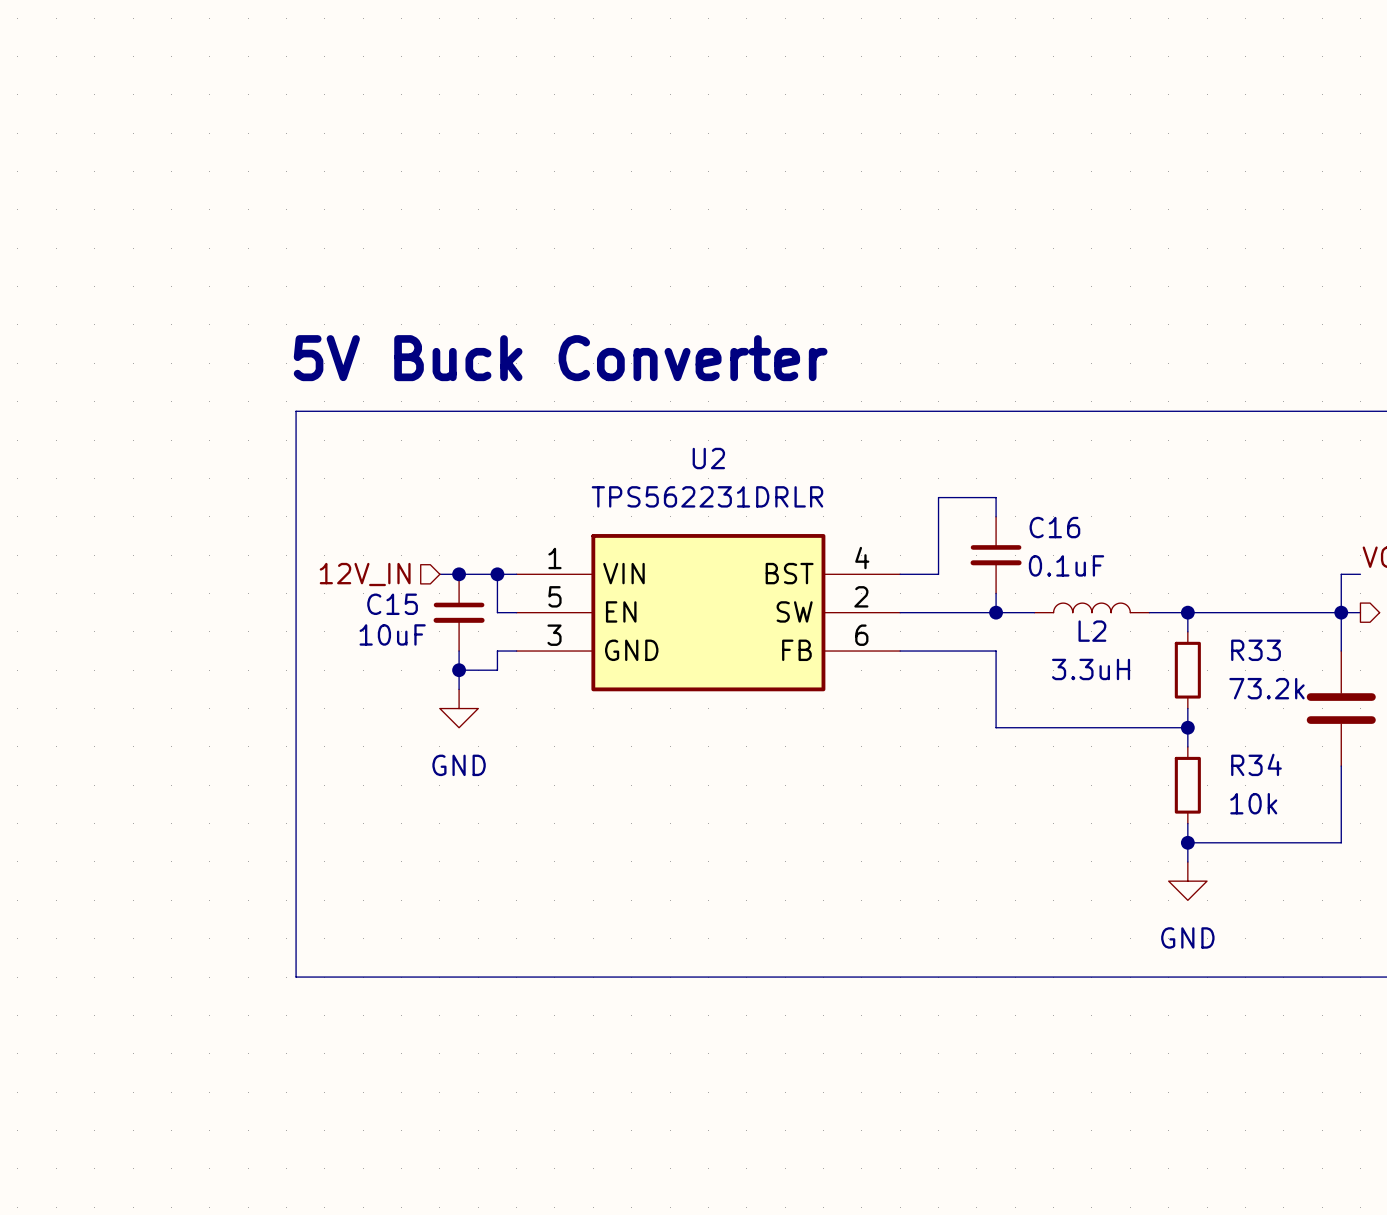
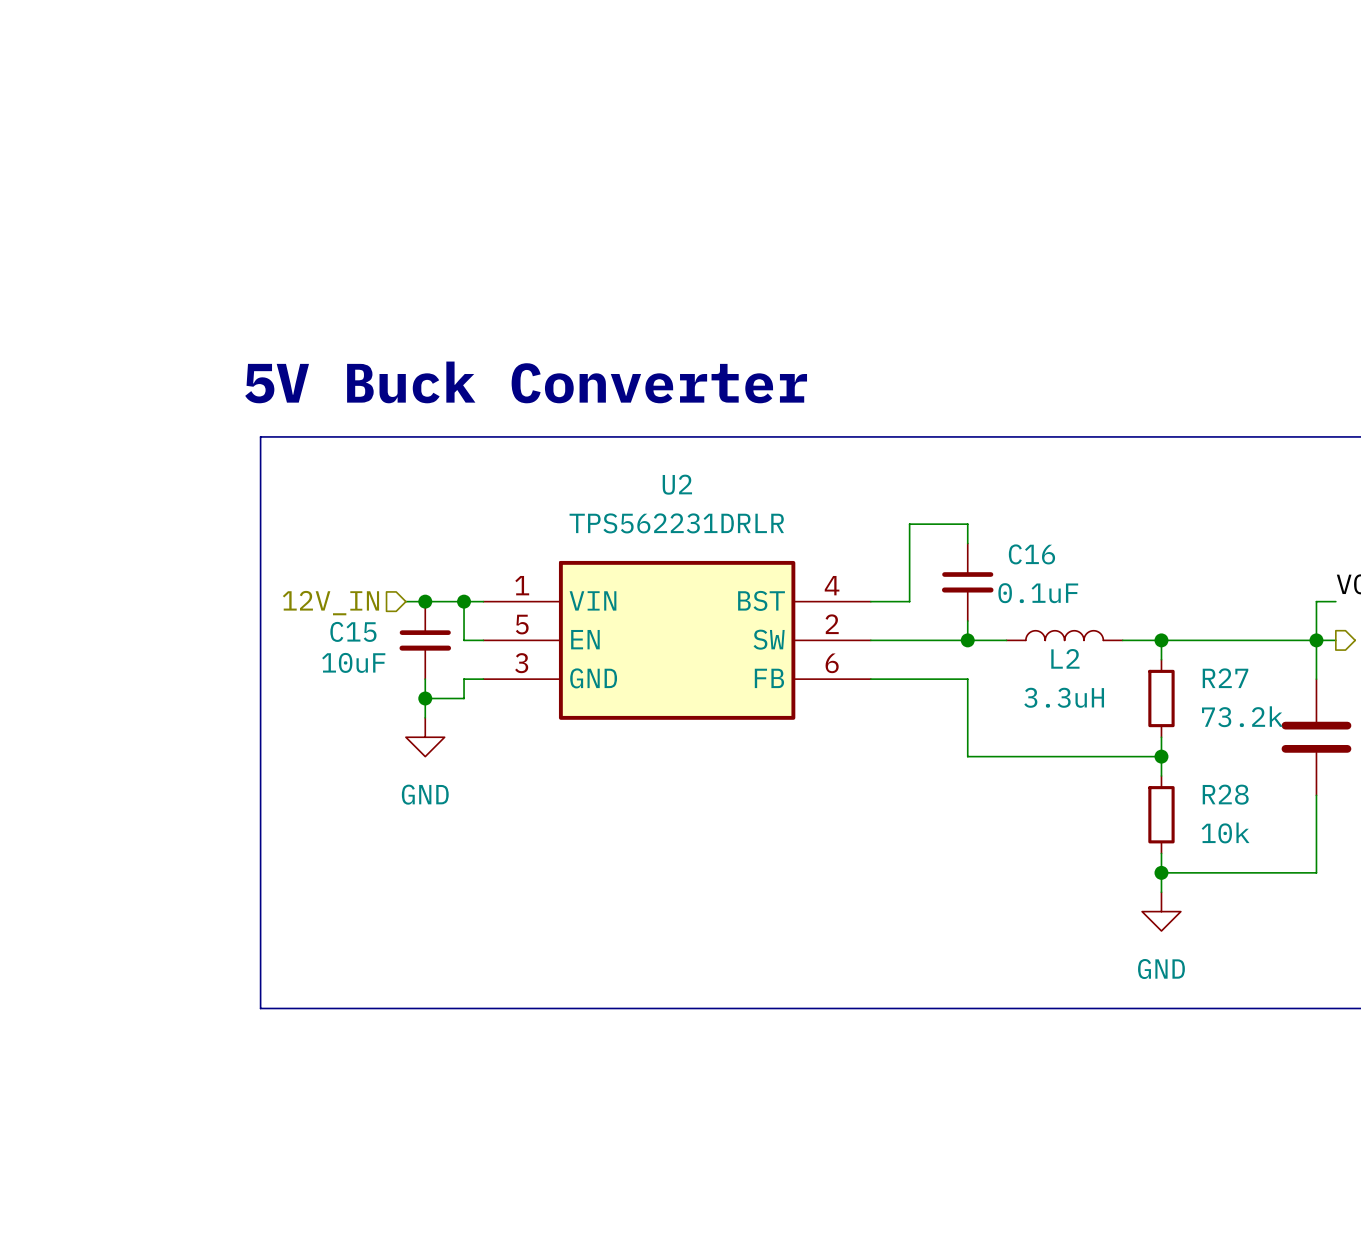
R33 name: R33 (1256, 650) -> R27 (1225, 678)
R34 name: R34 (1256, 764) -> R28 (1225, 794)

